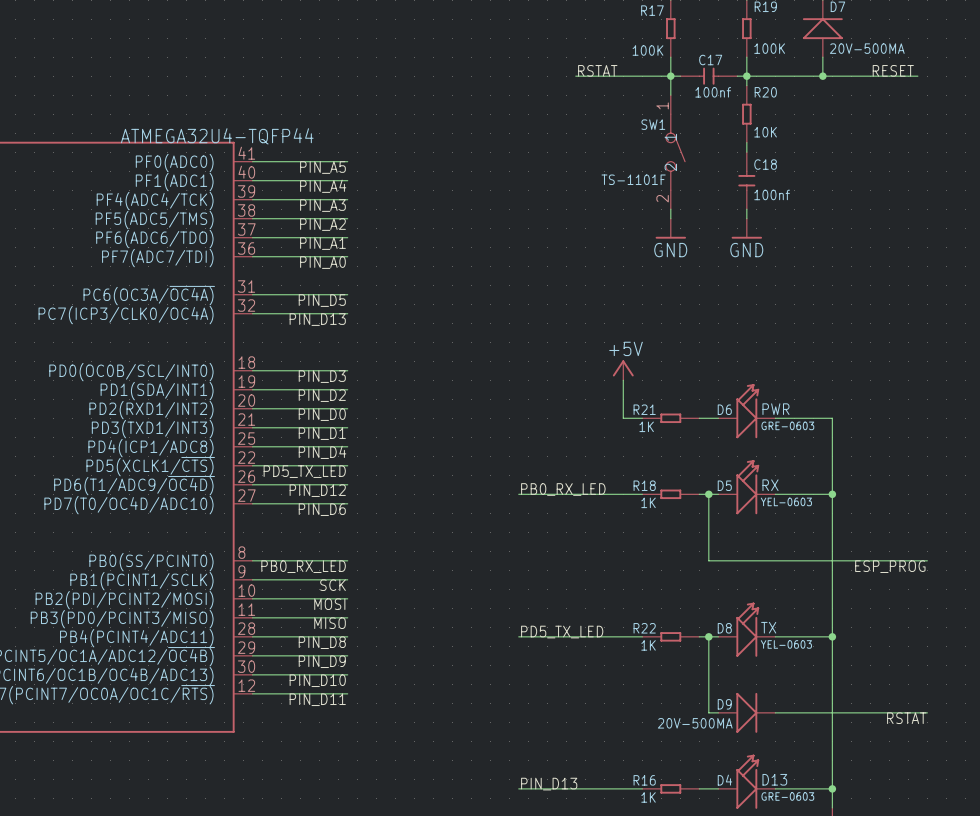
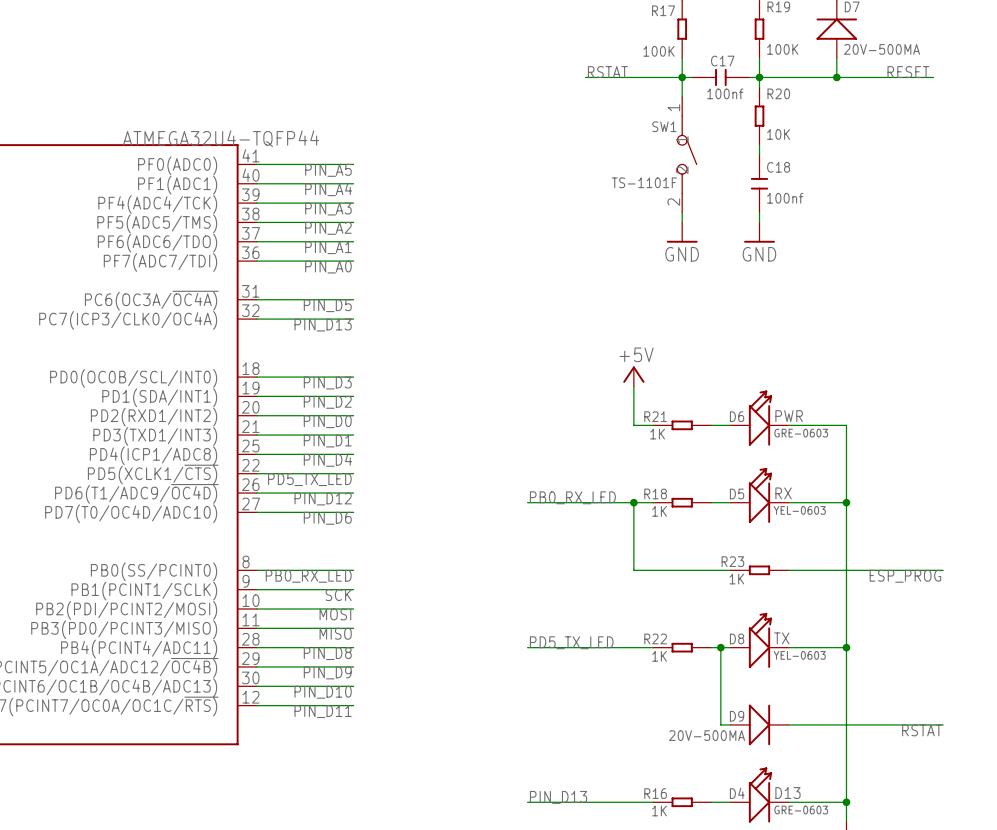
junction: none -> (633, 502)
wire: (708, 494) (708, 560) -> (633, 502) (633, 570) (720, 570)
junction: (708, 494) -> none
R23: none -> 1K (759, 570)

